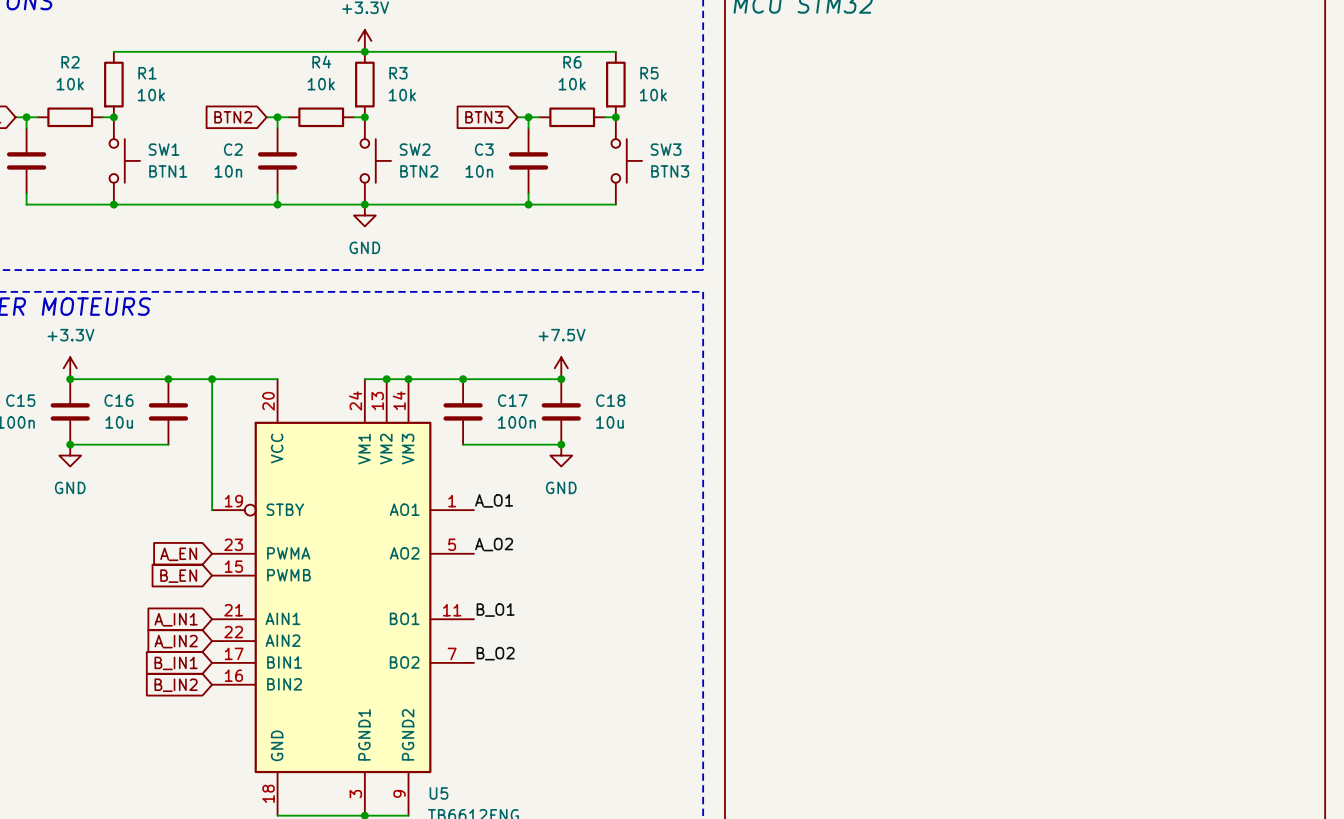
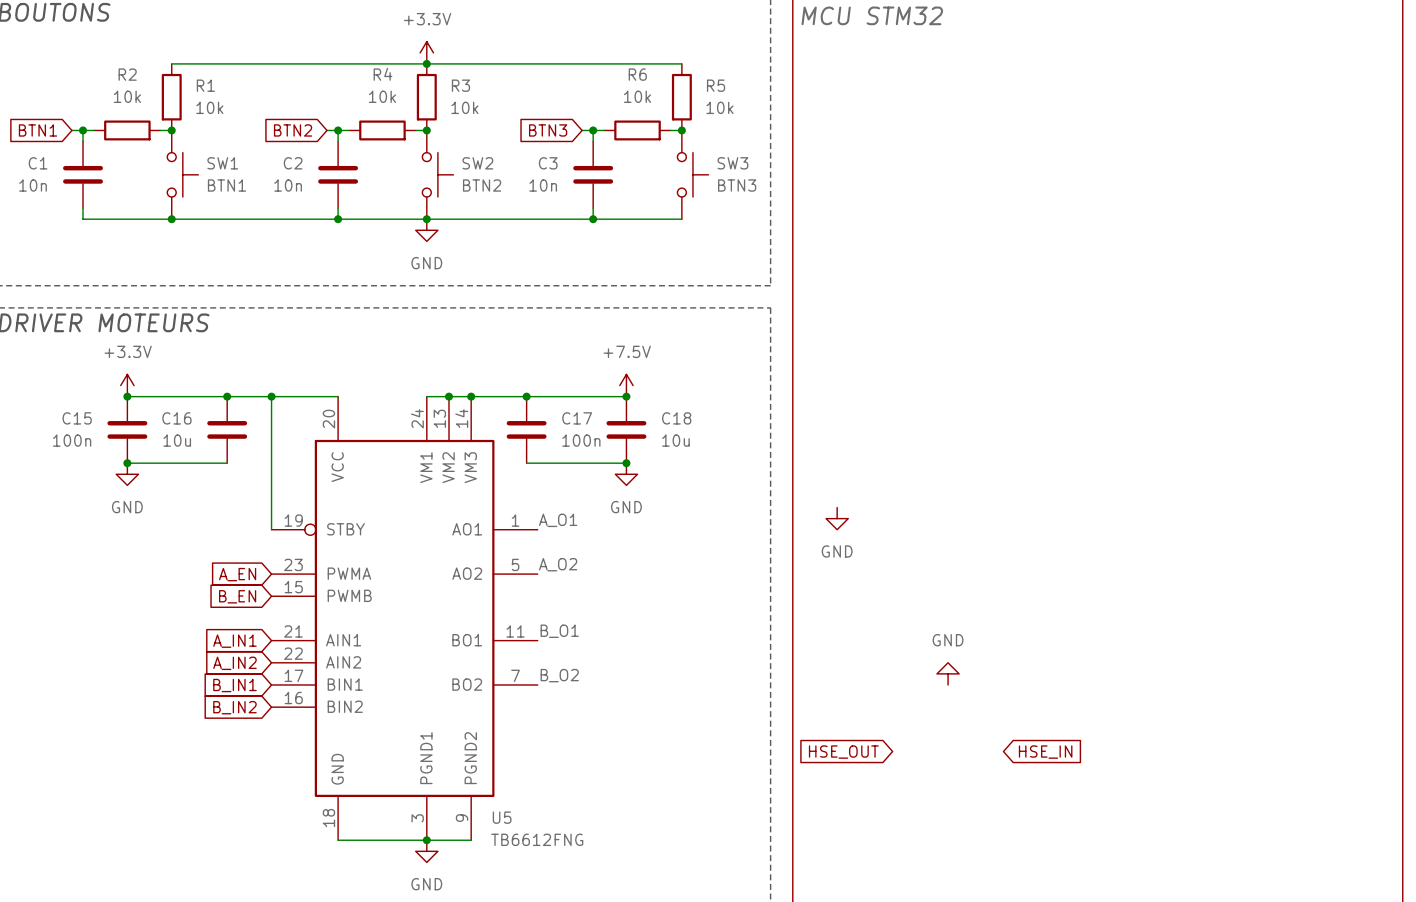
power symbol: none -> GND (837, 518)
power symbol: none -> GND (948, 673)
global label: none -> HSE_OUT (843, 752)
global label: none -> HSE_IN (1045, 752)

